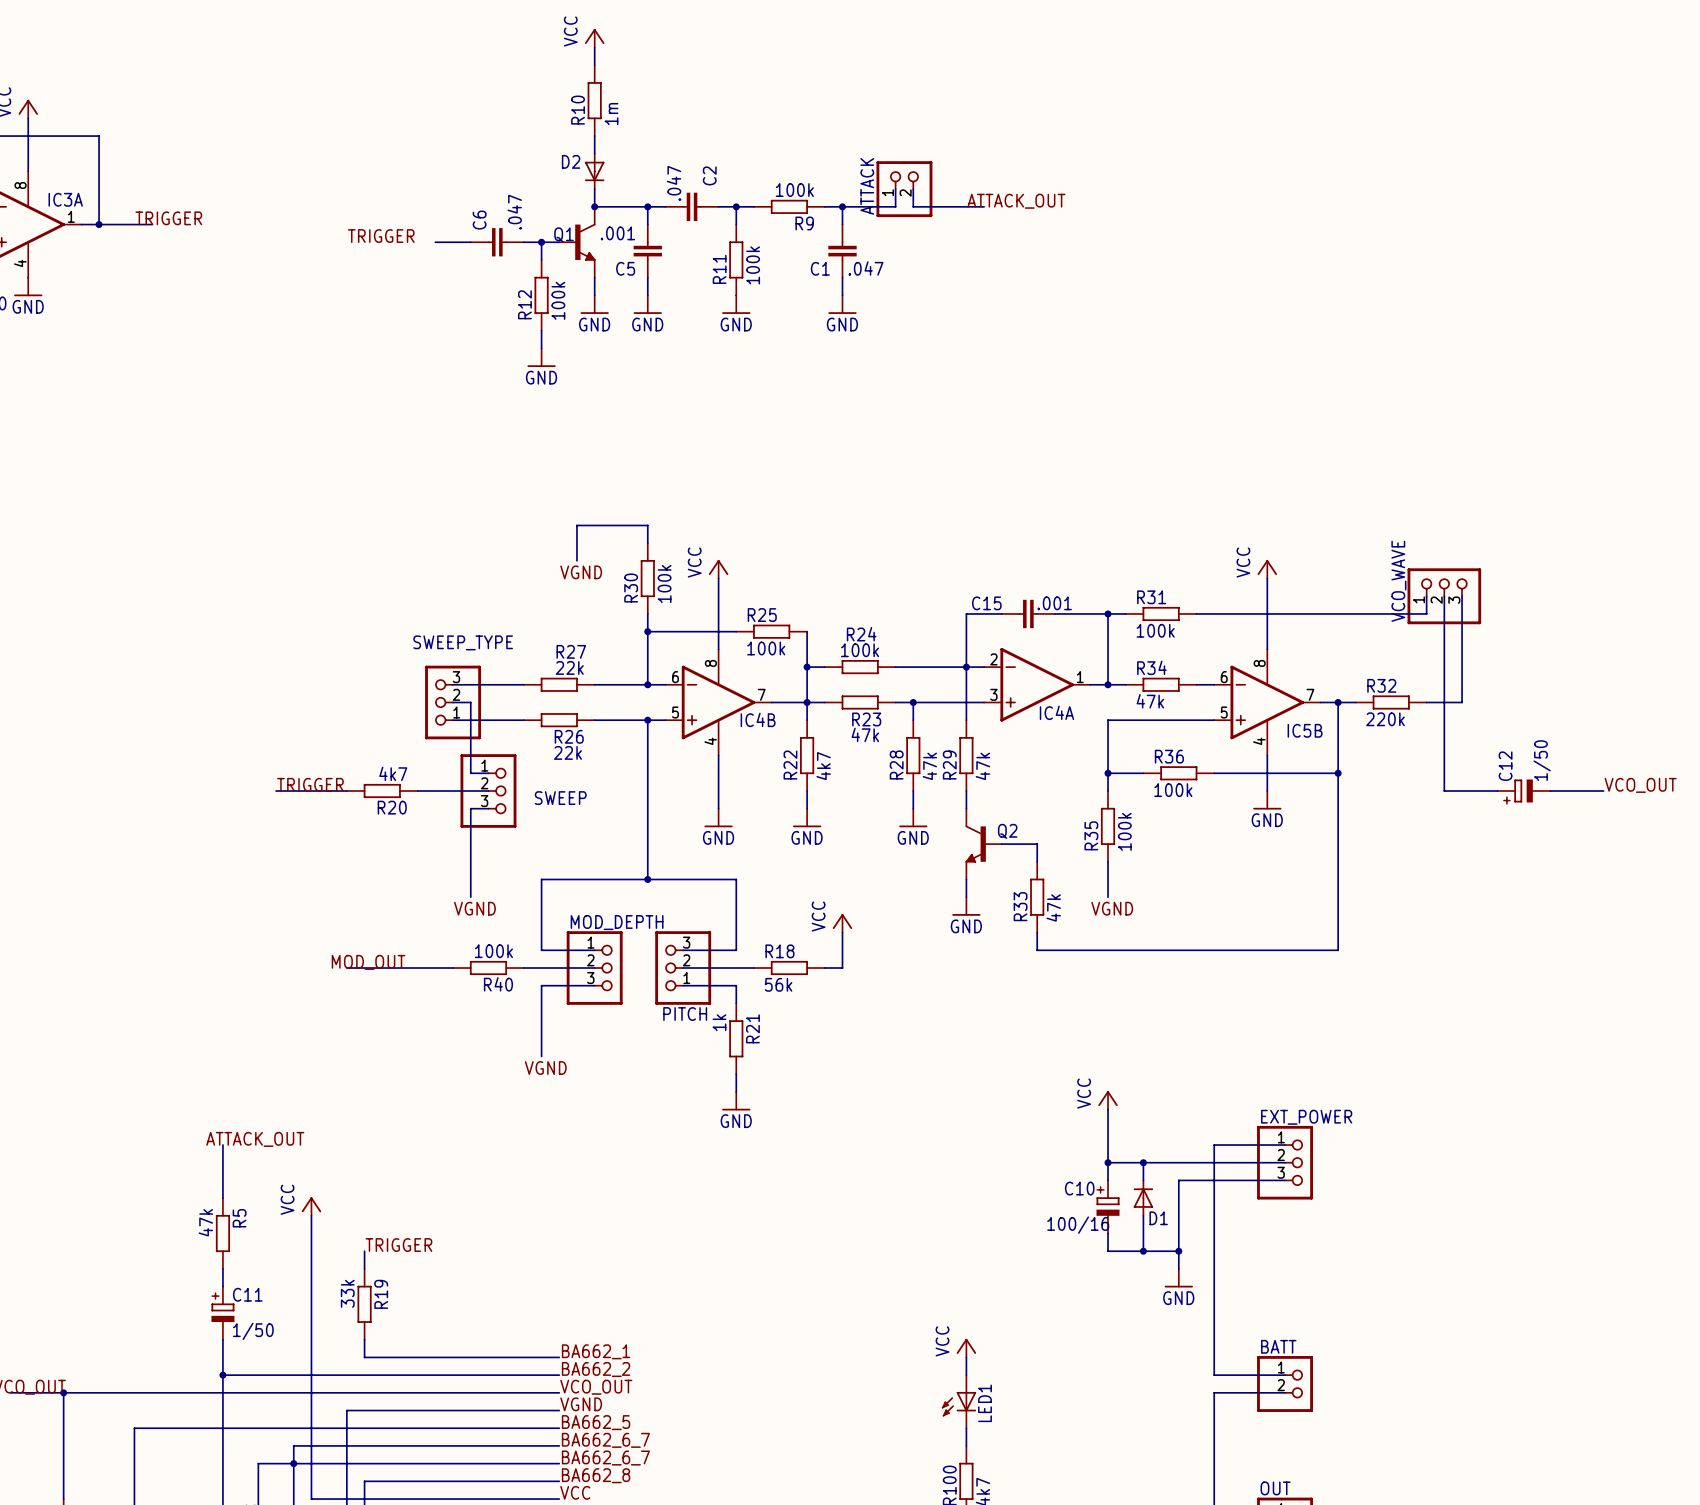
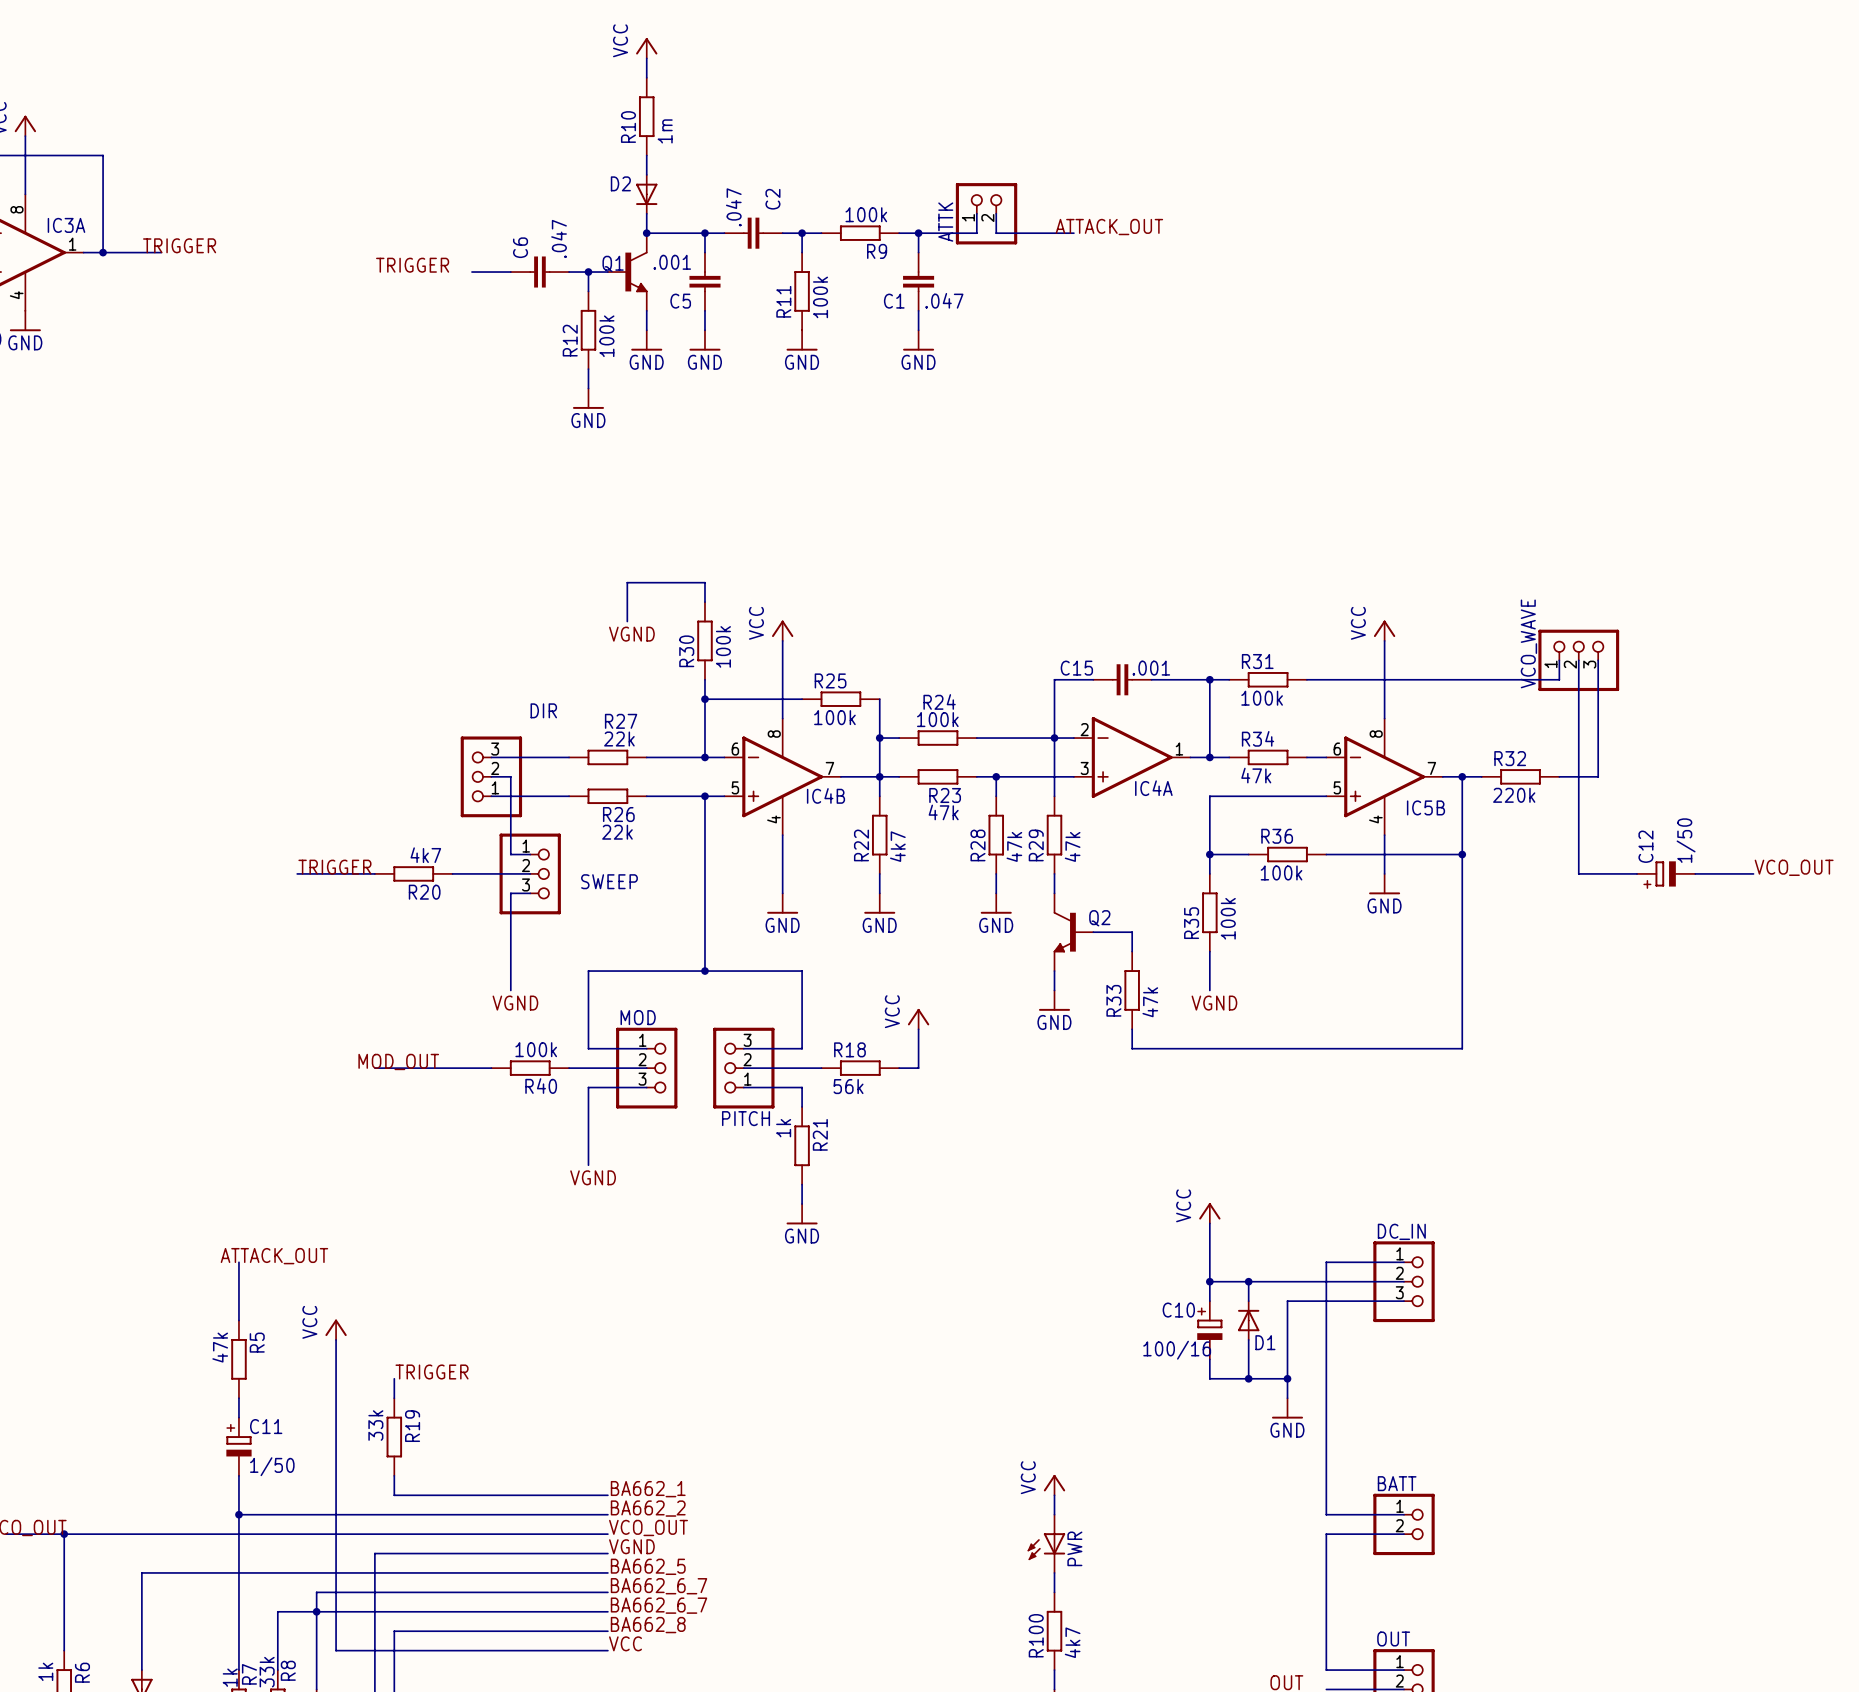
ATTACK name: ATTACK (867, 186) -> ATTK (945, 222)
SWEEP_TYPE name: SWEEP_TYPE (463, 642) -> DIR (543, 710)
MOD_DEPTH name: MOD_DEPTH (617, 922) -> MOD (638, 1017)
EXT_POWER name: EXT_POWER (1306, 1117) -> DC_IN (1401, 1231)
LED1 name: LED1 (984, 1403) -> PWR (1074, 1548)

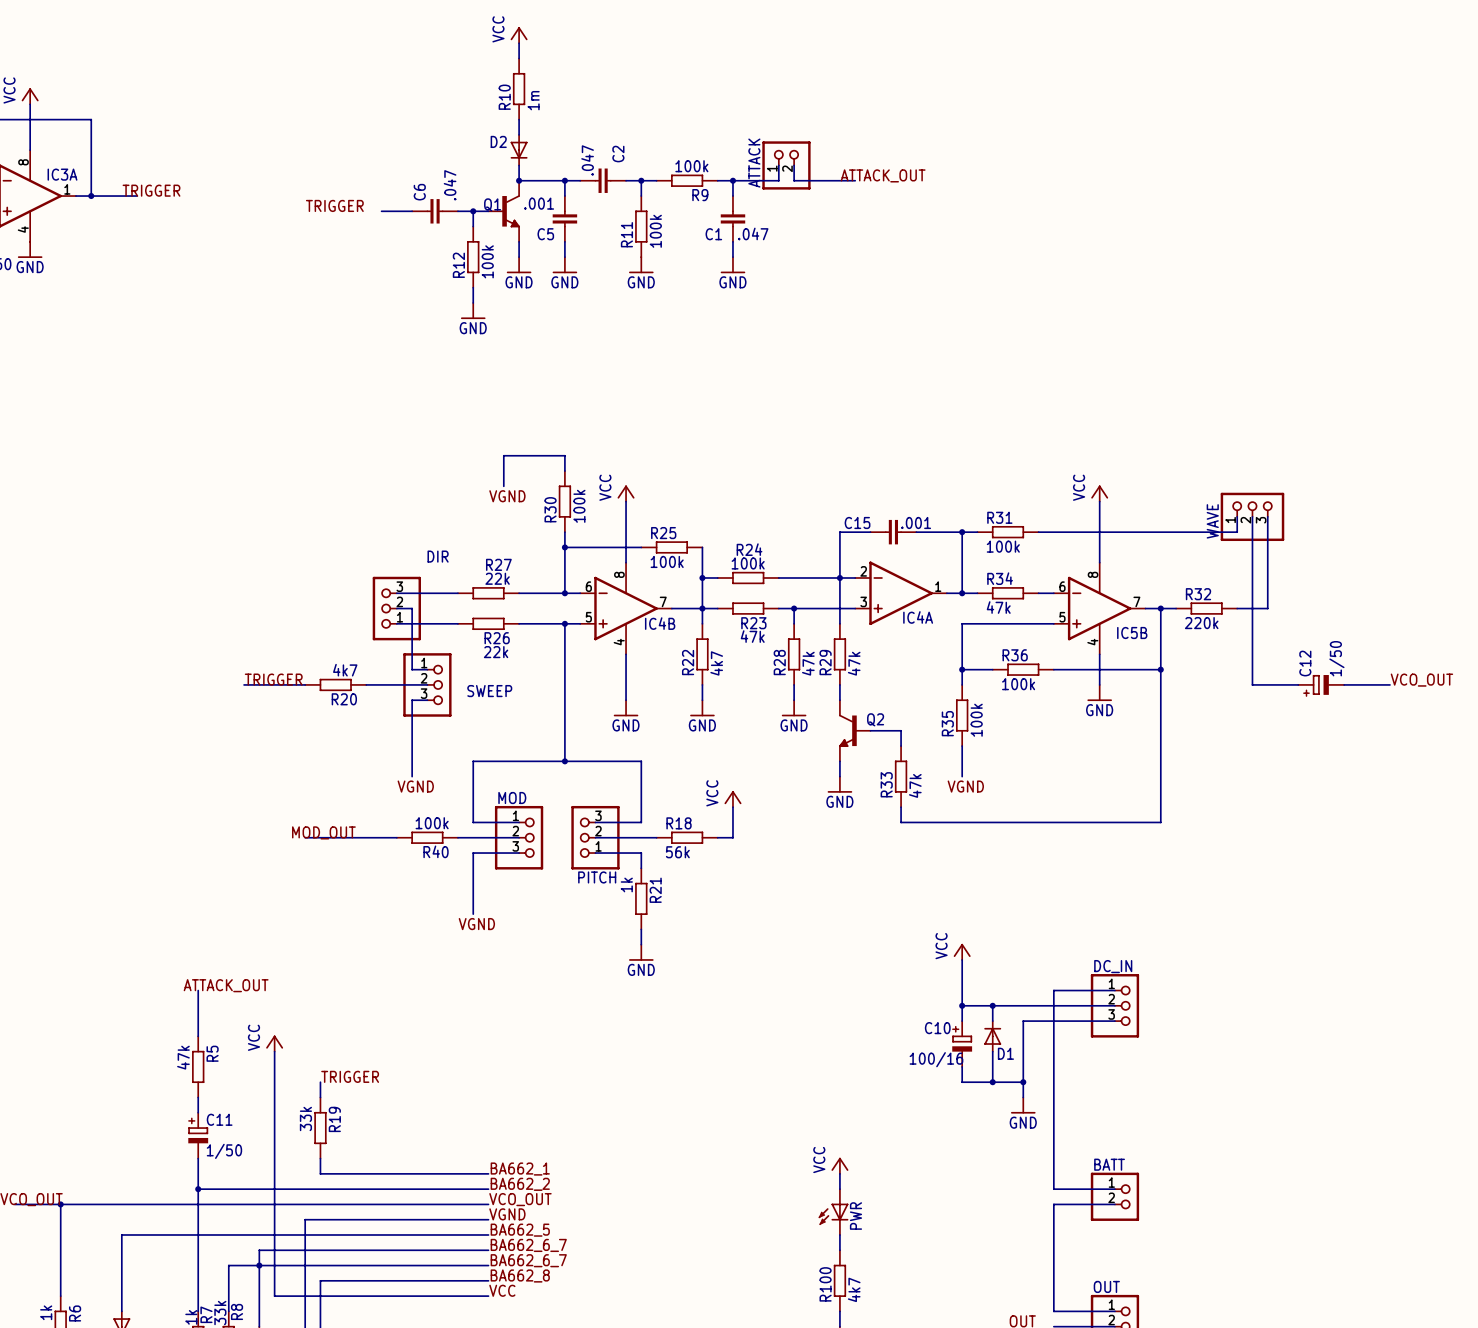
ATTK name: ATTK (945, 222) -> ATTACK (754, 163)
VCO_WAVE name: VCO_WAVE (1528, 643) -> WAVE (1212, 521)

